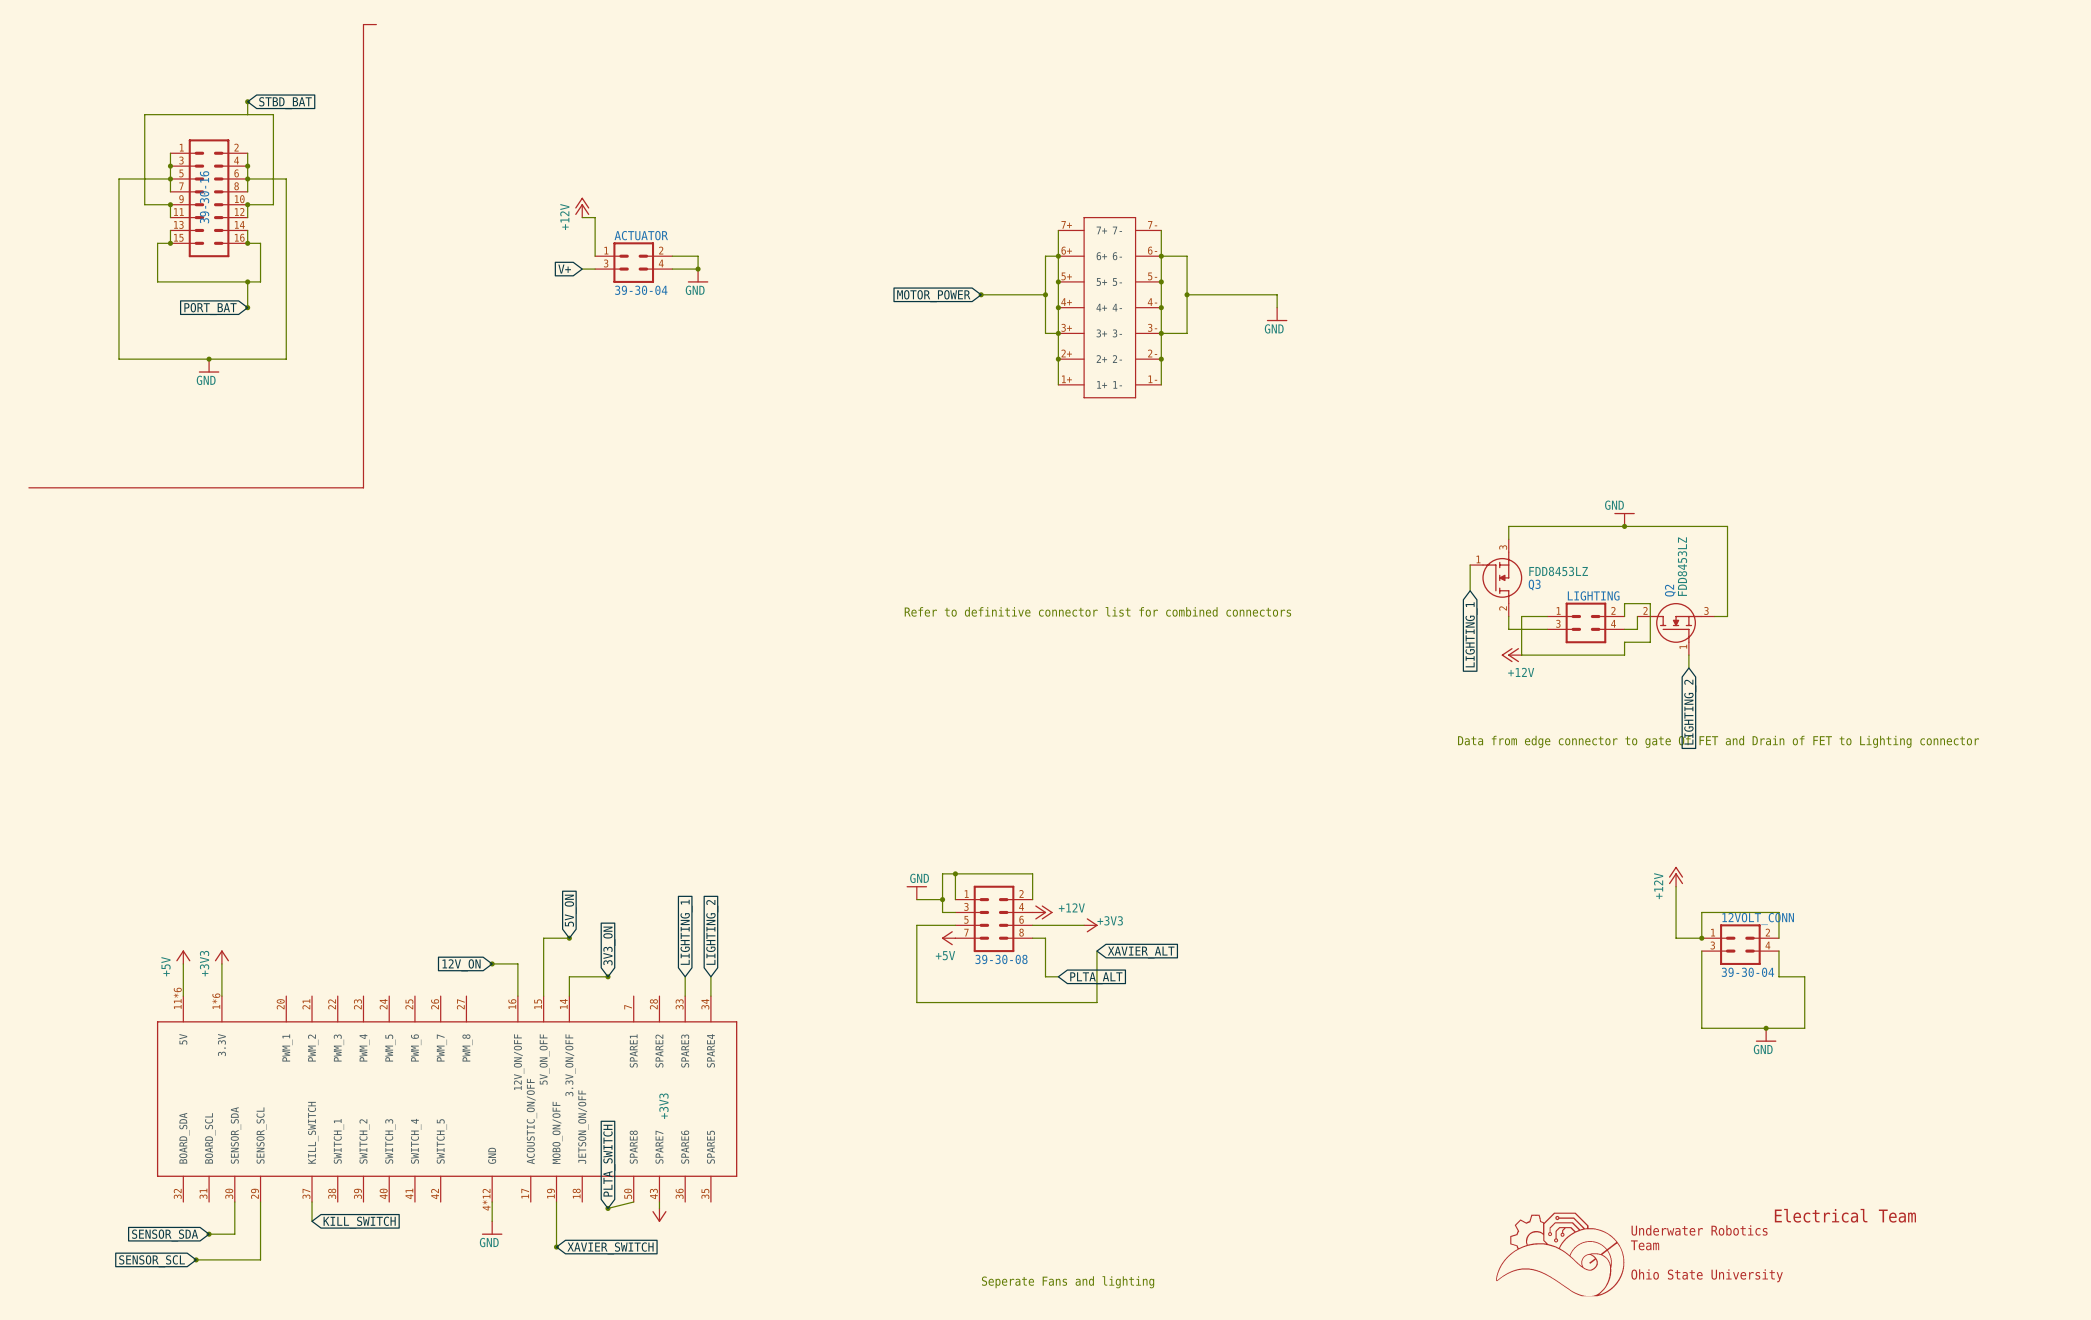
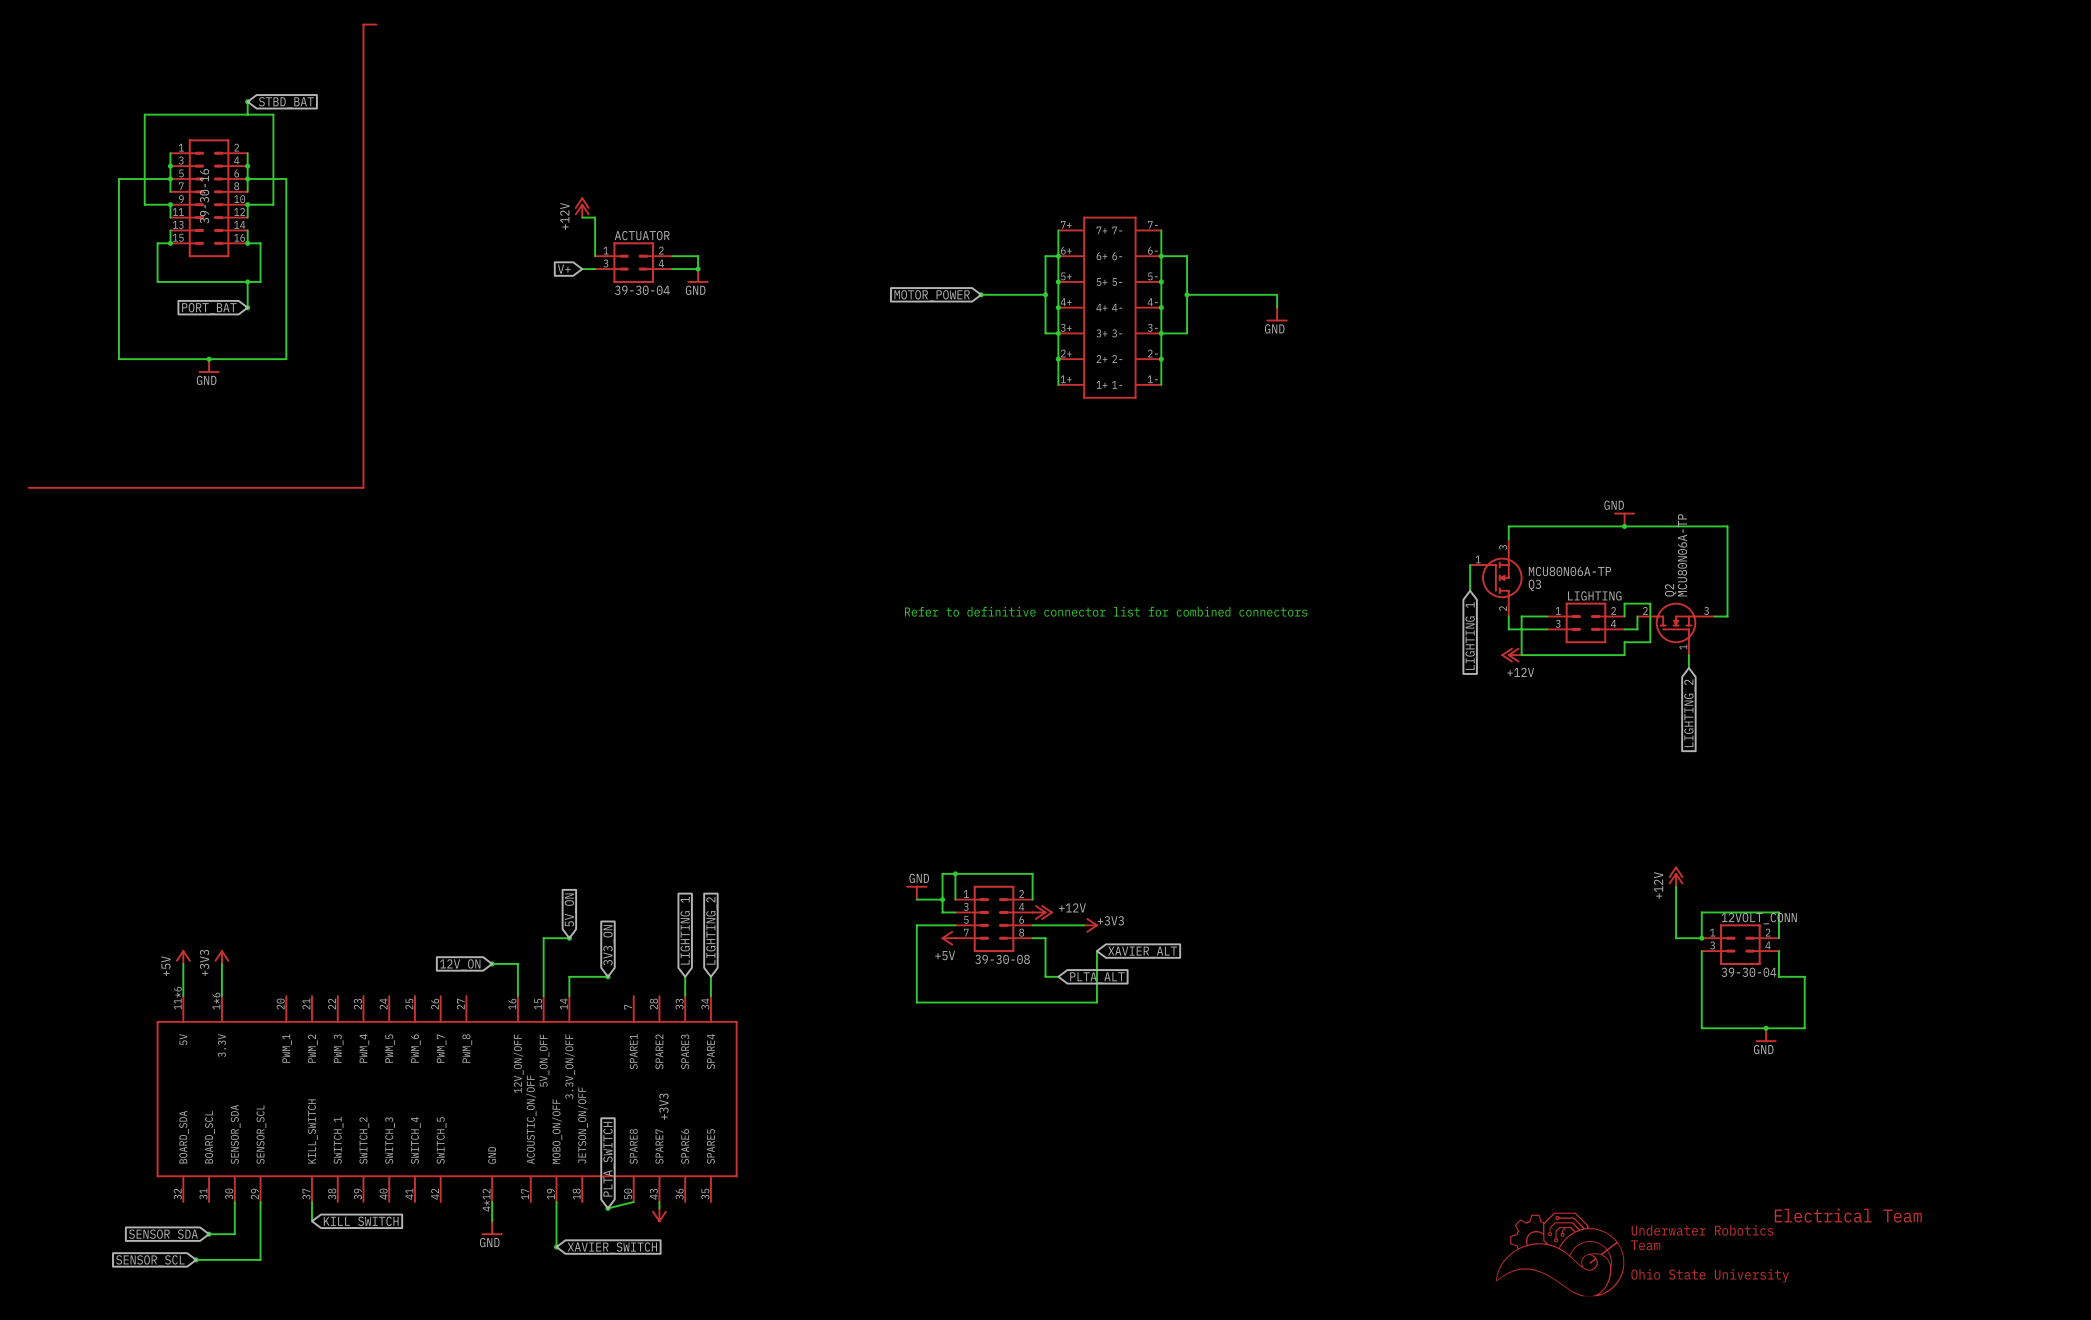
Q2 value: FDD8453LZ (1682, 566) -> MCU80N06A-TP (1682, 555)
Q3 value: FDD8453LZ (1558, 571) -> MCU80N06A-TP (1569, 571)
text: Data from edge connector to gate Of FET and Drain of FET to Lighting connector (1718, 741) -> none
text: Seperate Fans and lighting (1068, 1282) -> none

